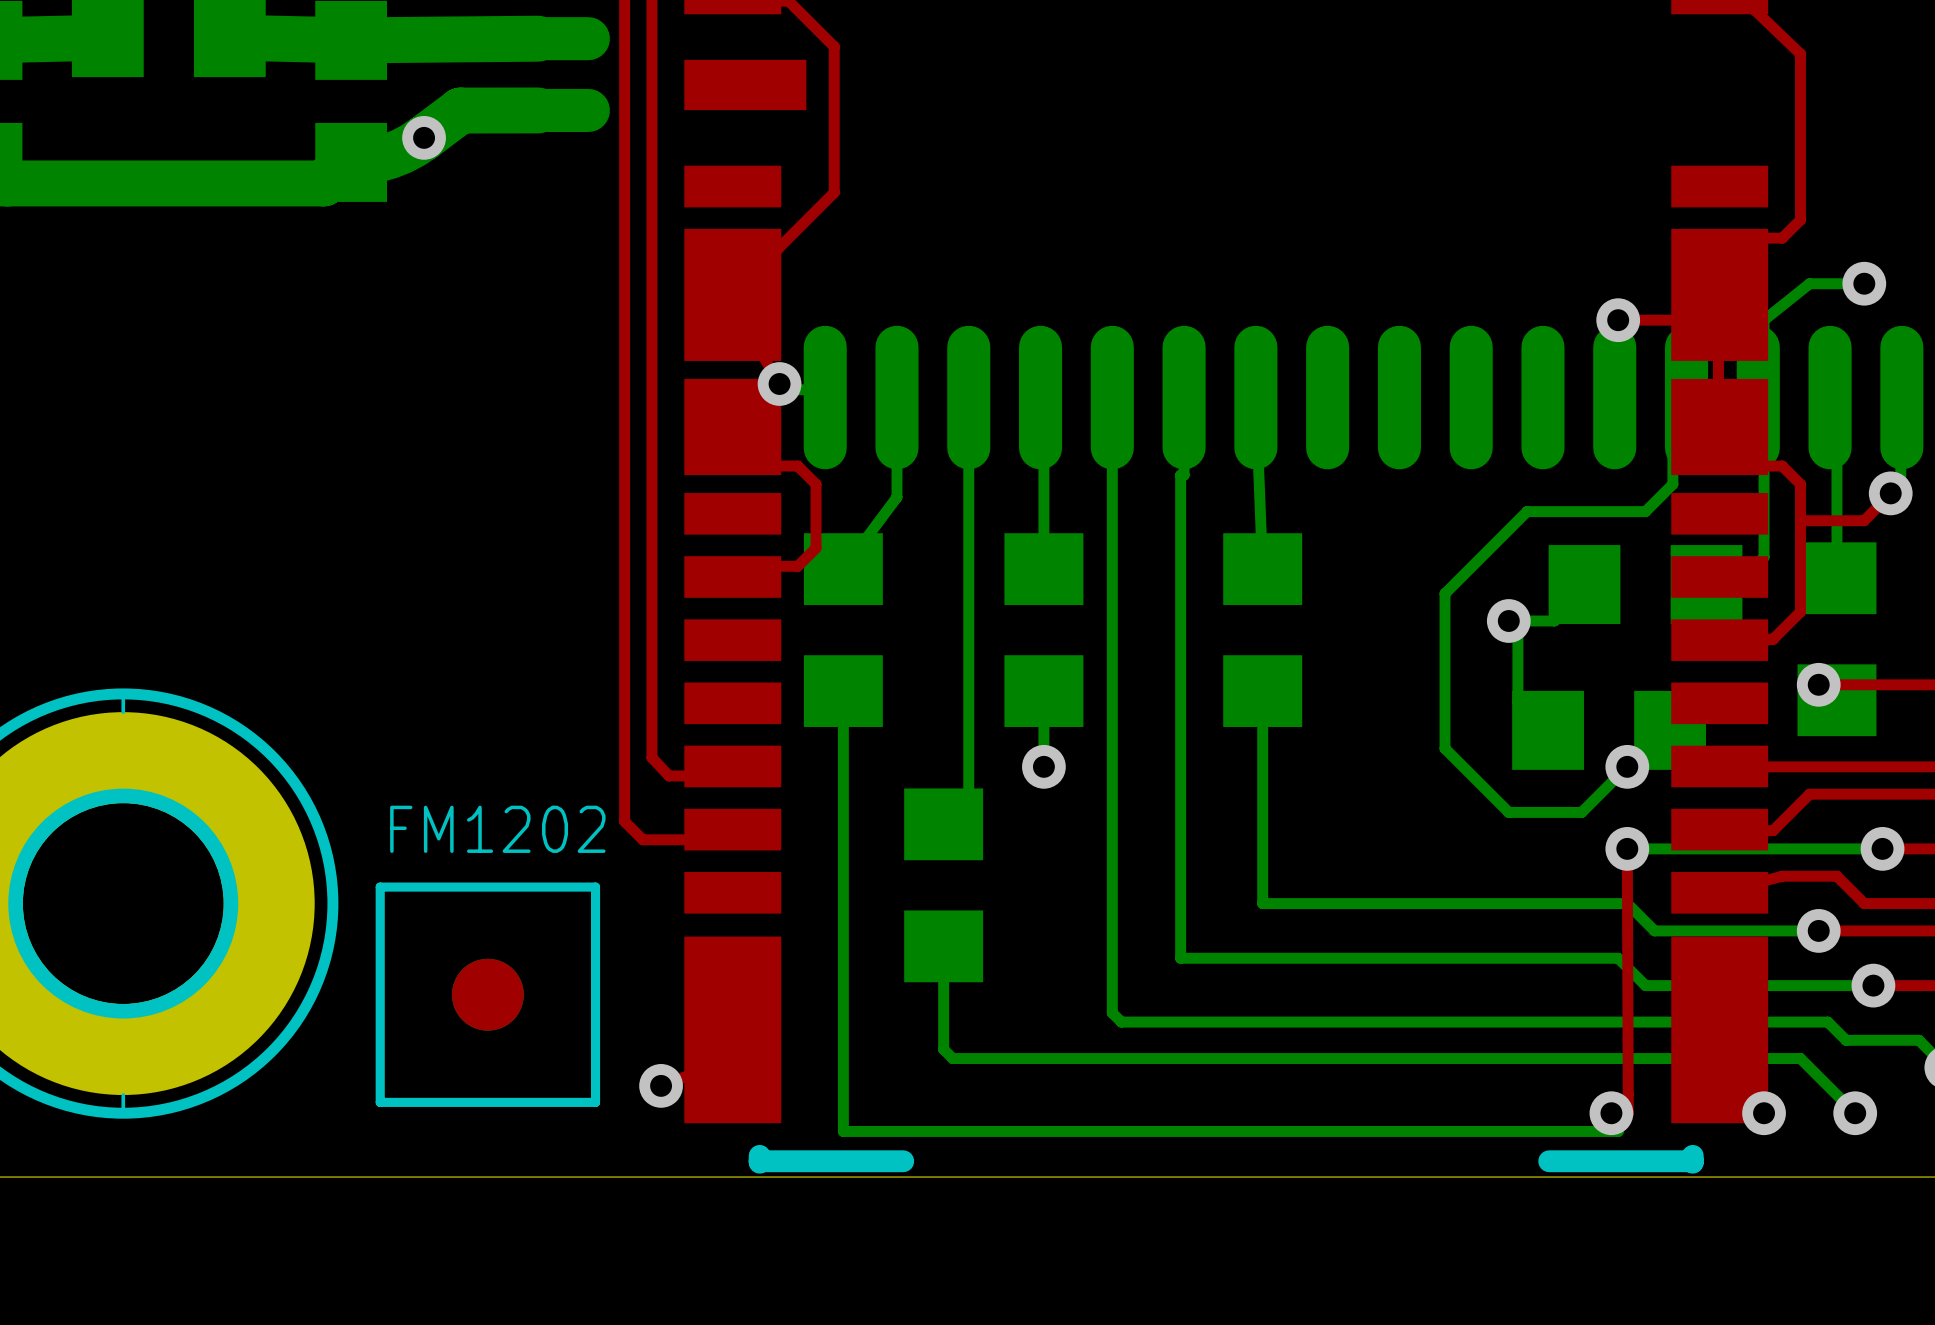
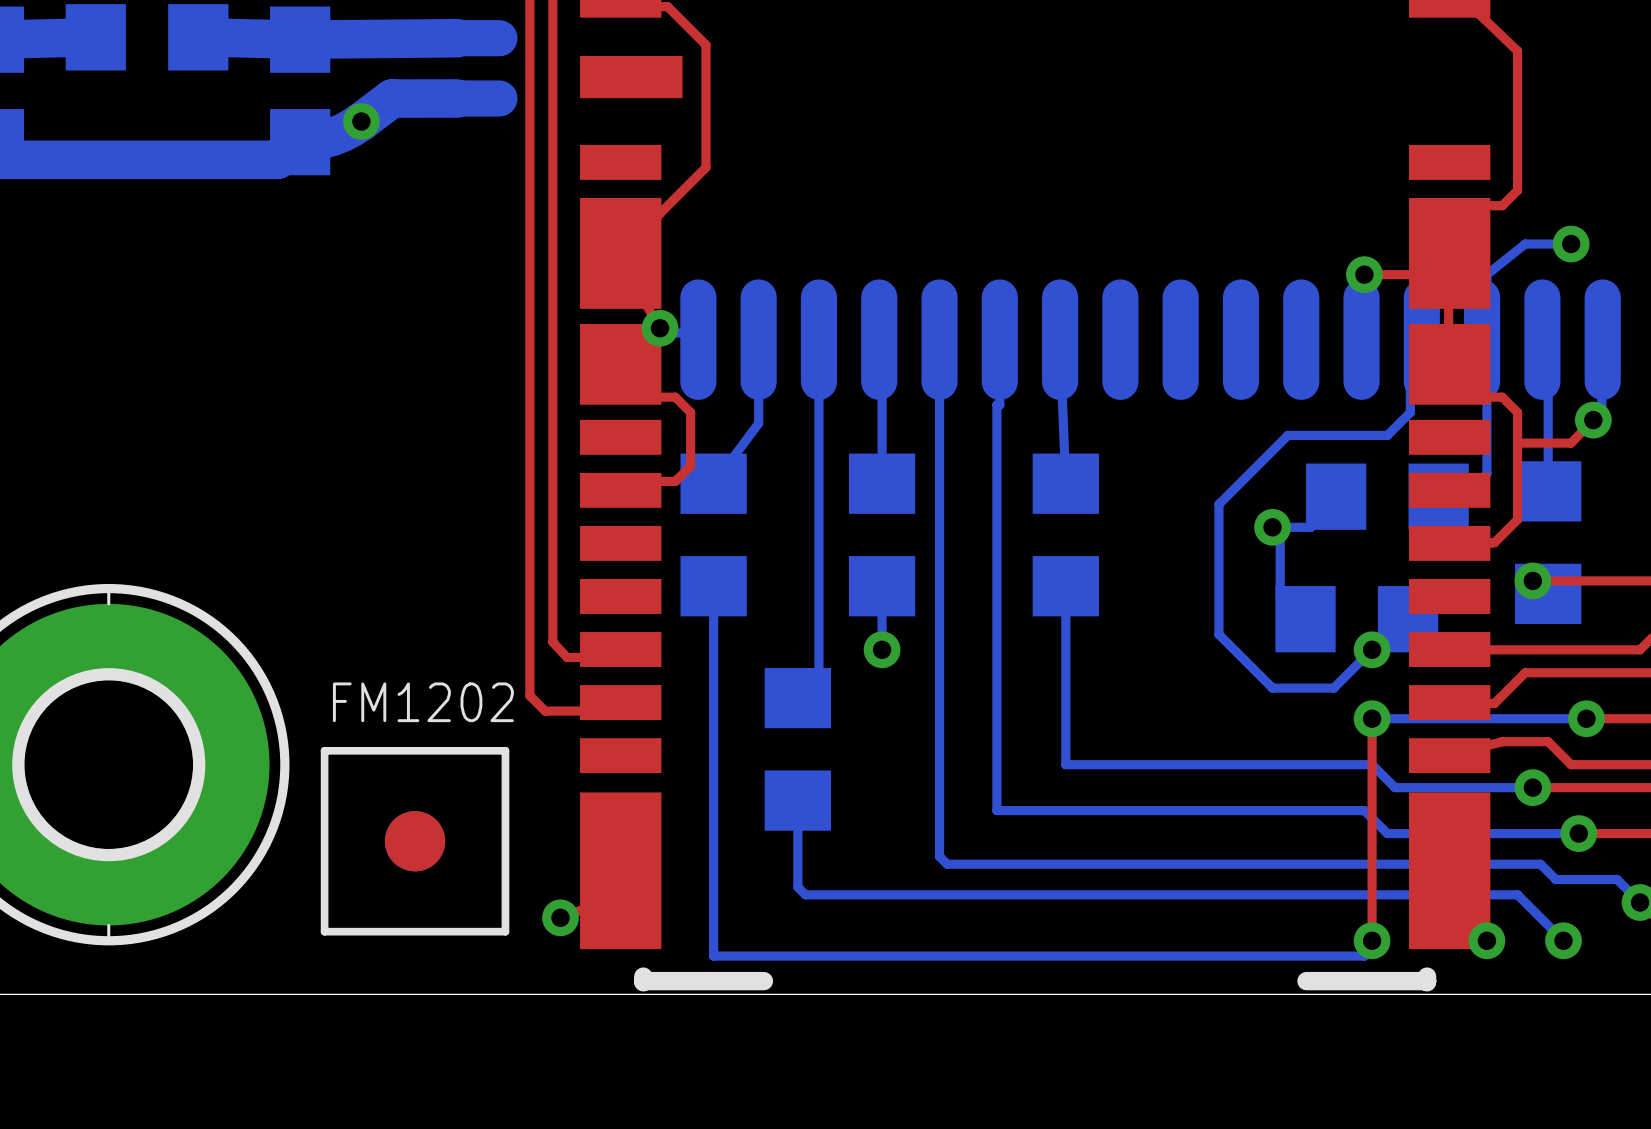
top track: (1627, 848) (1628, 1113) (1611, 1113) -> (1372, 718) (1372, 940)
via position: (1611, 1113) -> (1372, 940)

